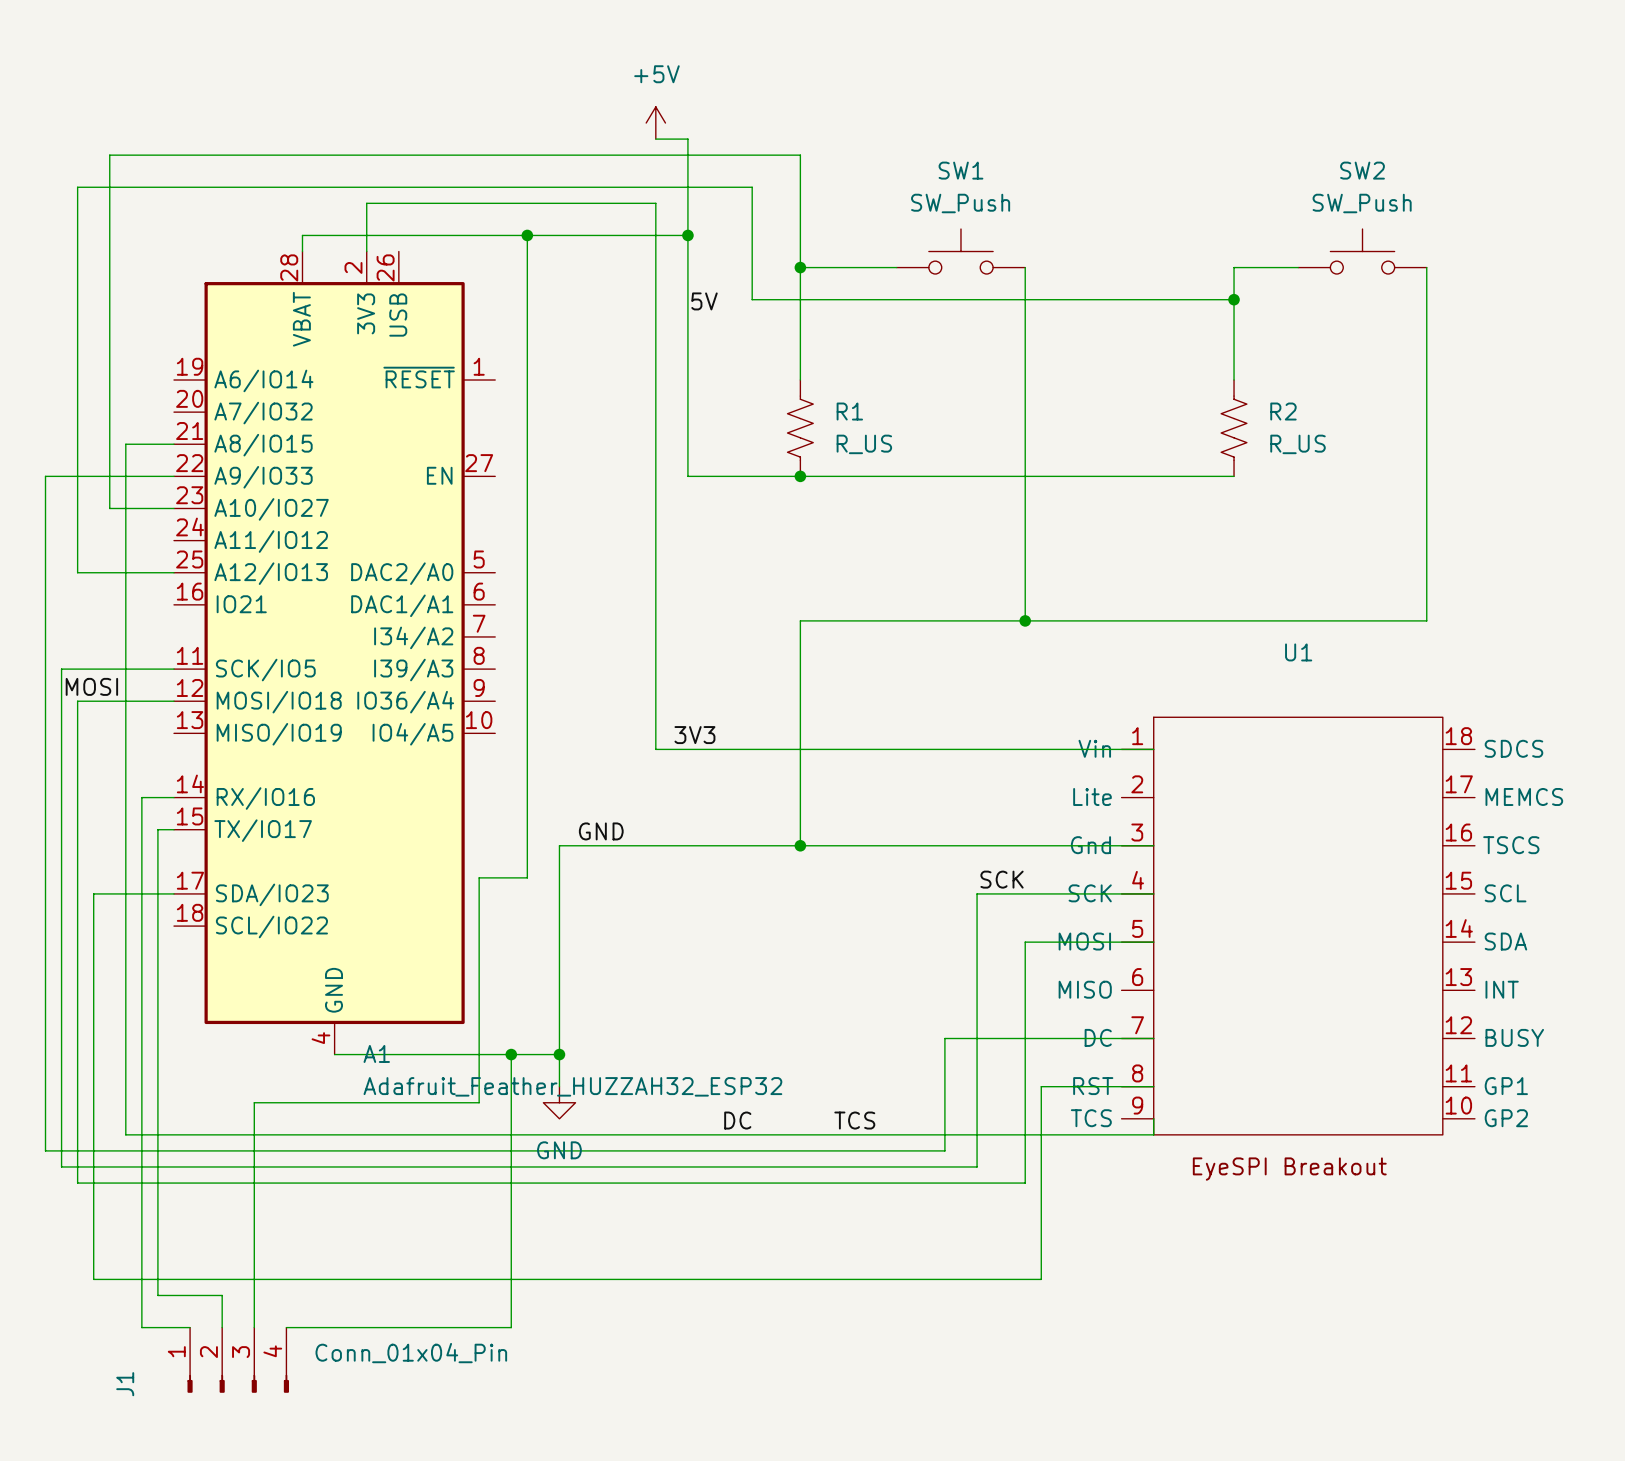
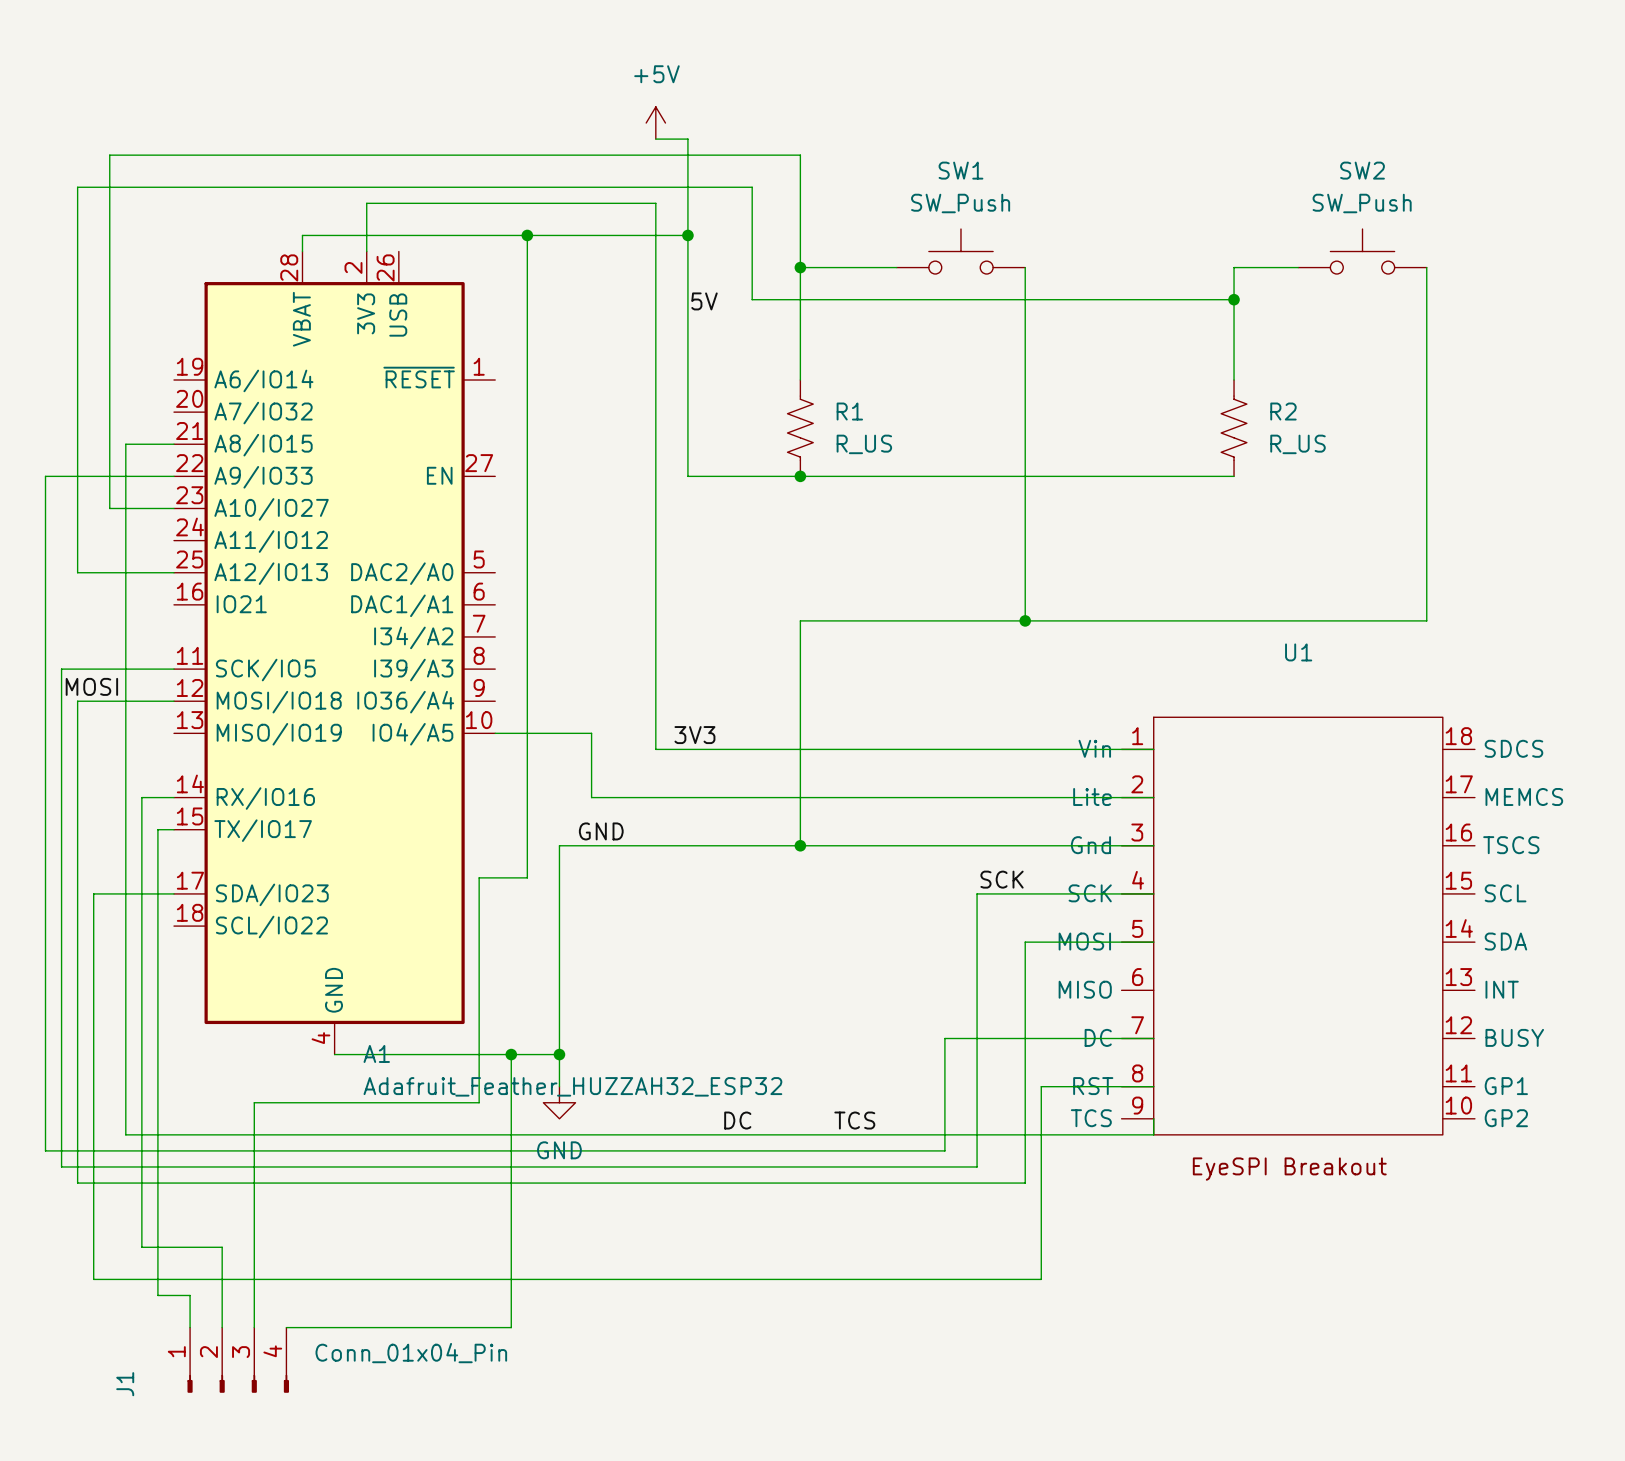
wire: none -> (495, 733) (591, 733) (591, 797) (1153, 797)
wire: (141, 1247) (141, 1327) (190, 1327) -> (141, 1247) (222, 1247) (222, 1295)
wire: (190, 1295) (222, 1295) -> (190, 1295) (190, 1327)

